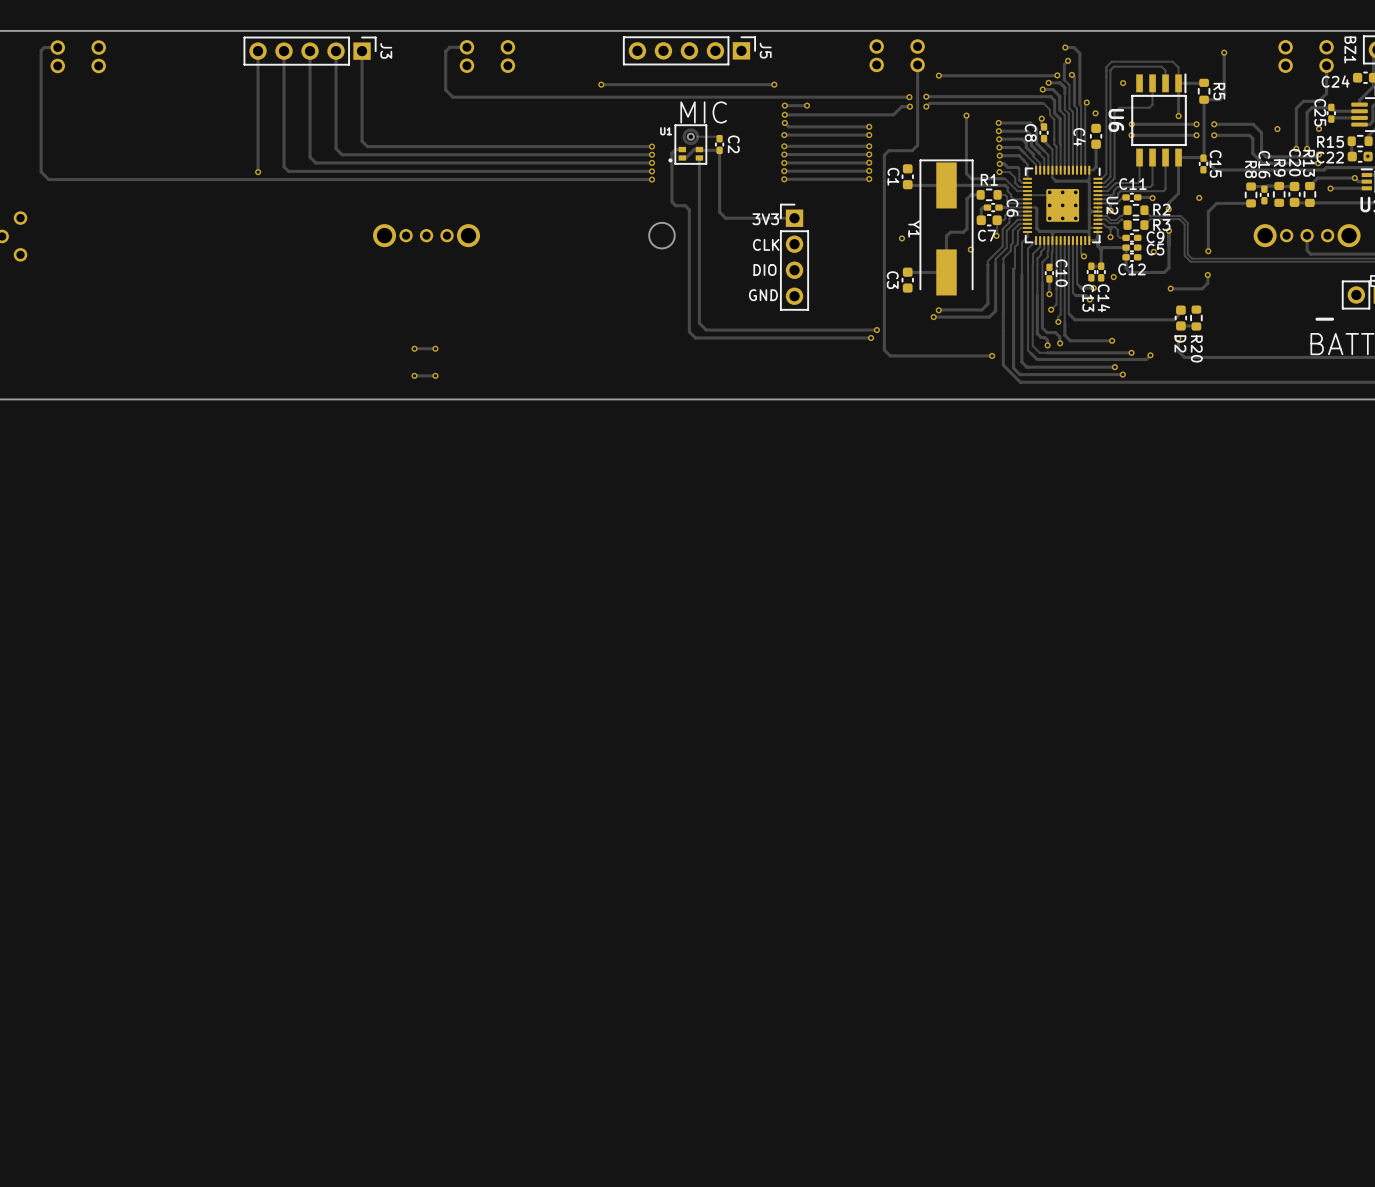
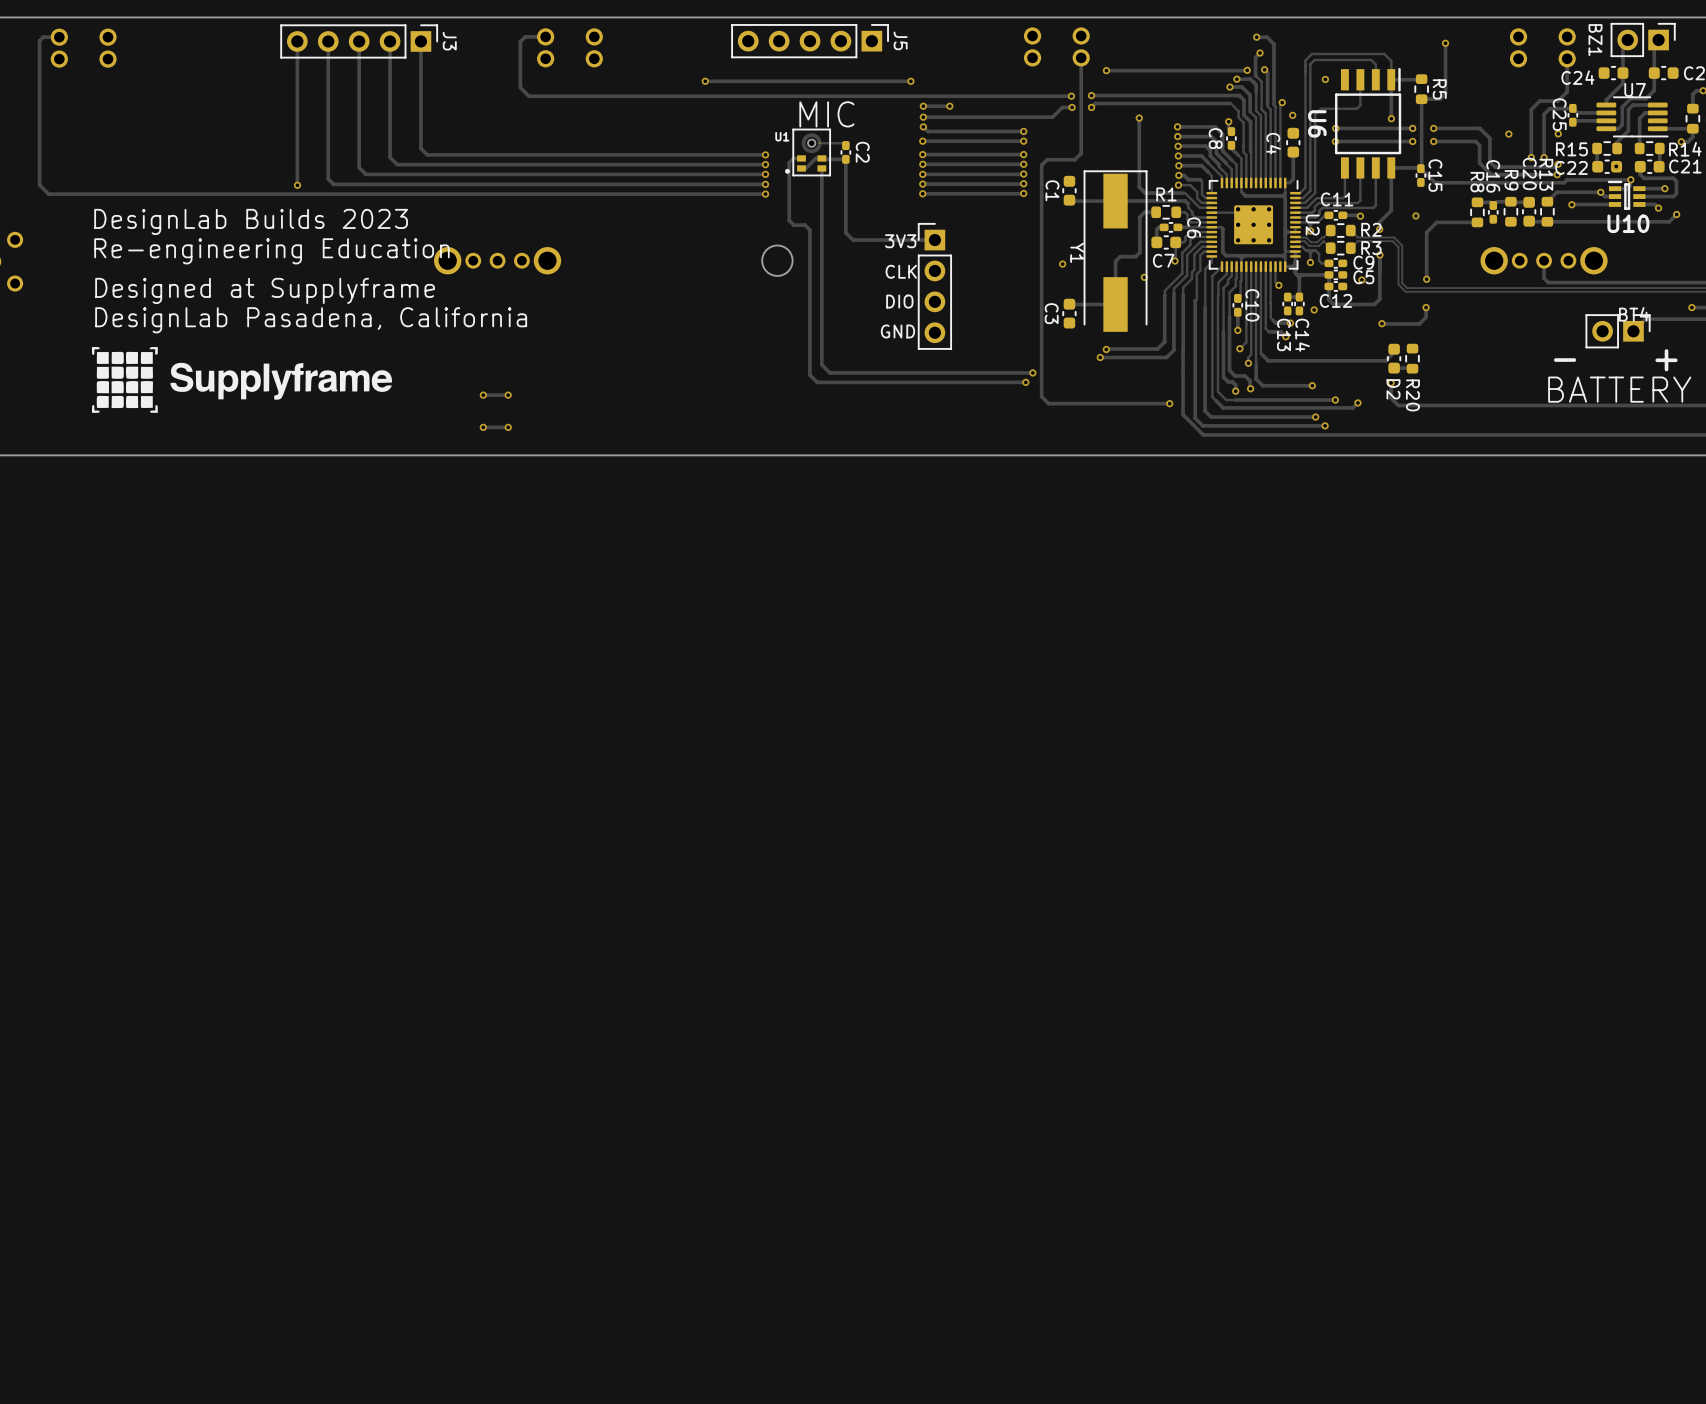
text: none -> DesignLab Builds 2023 (251, 221)
text: none -> Re-engineering Education (271, 251)
text: none -> Designed at Supplyframe (265, 290)
text: none -> DesignLab Pasadena, California (311, 320)
drawing: none -> [91, 347, 393, 413]

